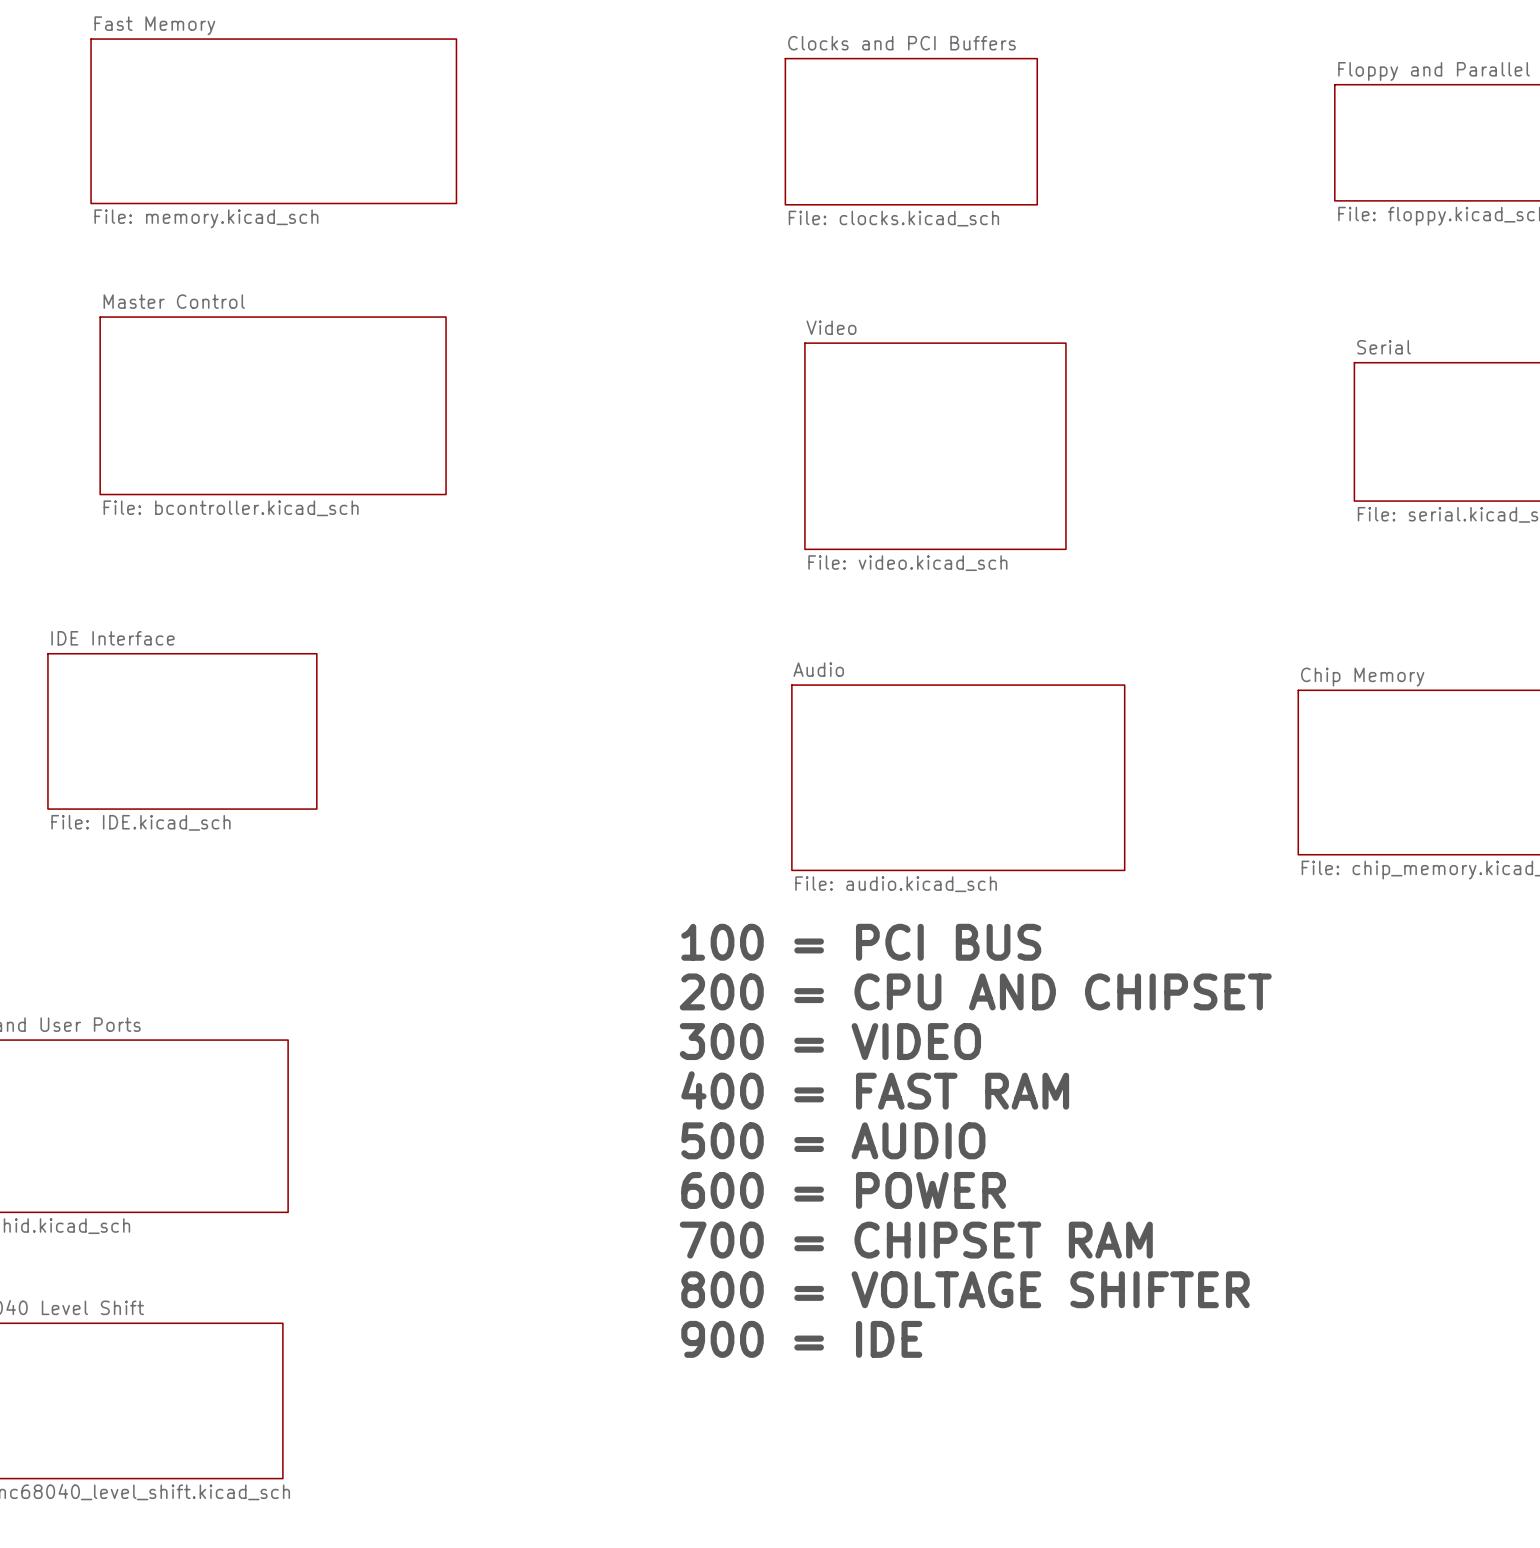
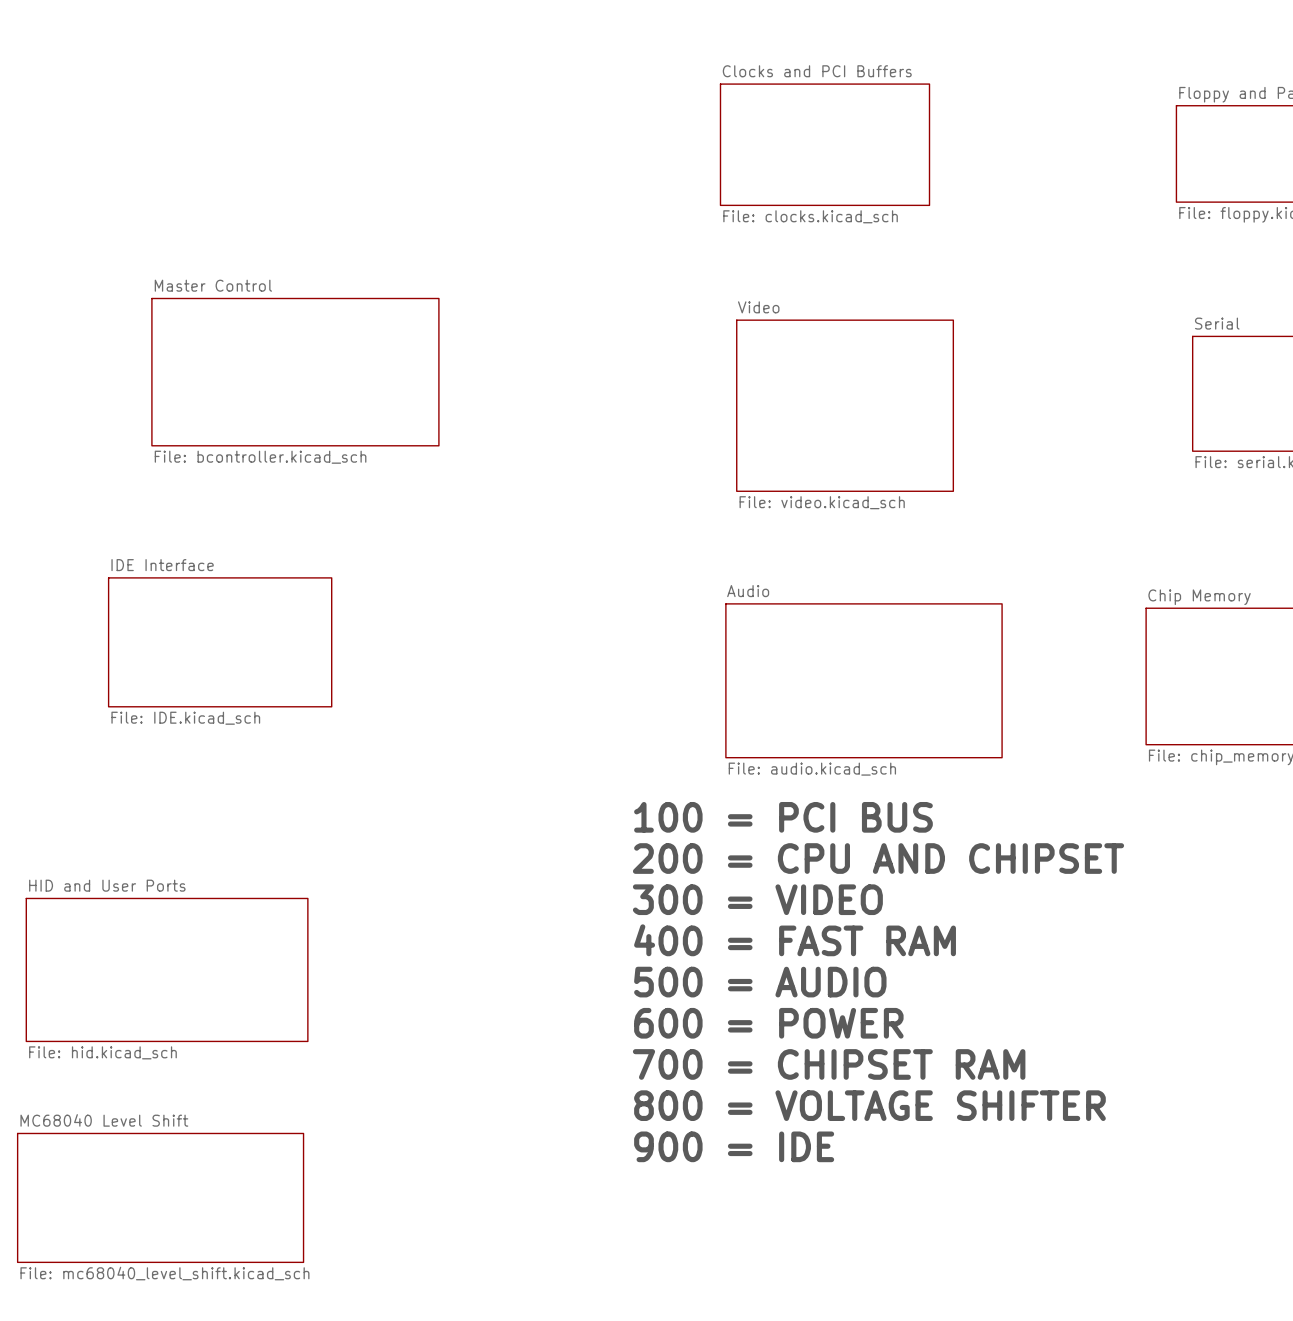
sheet Fast Memory: File: memory.kicad_sch (273, 121) -> none

